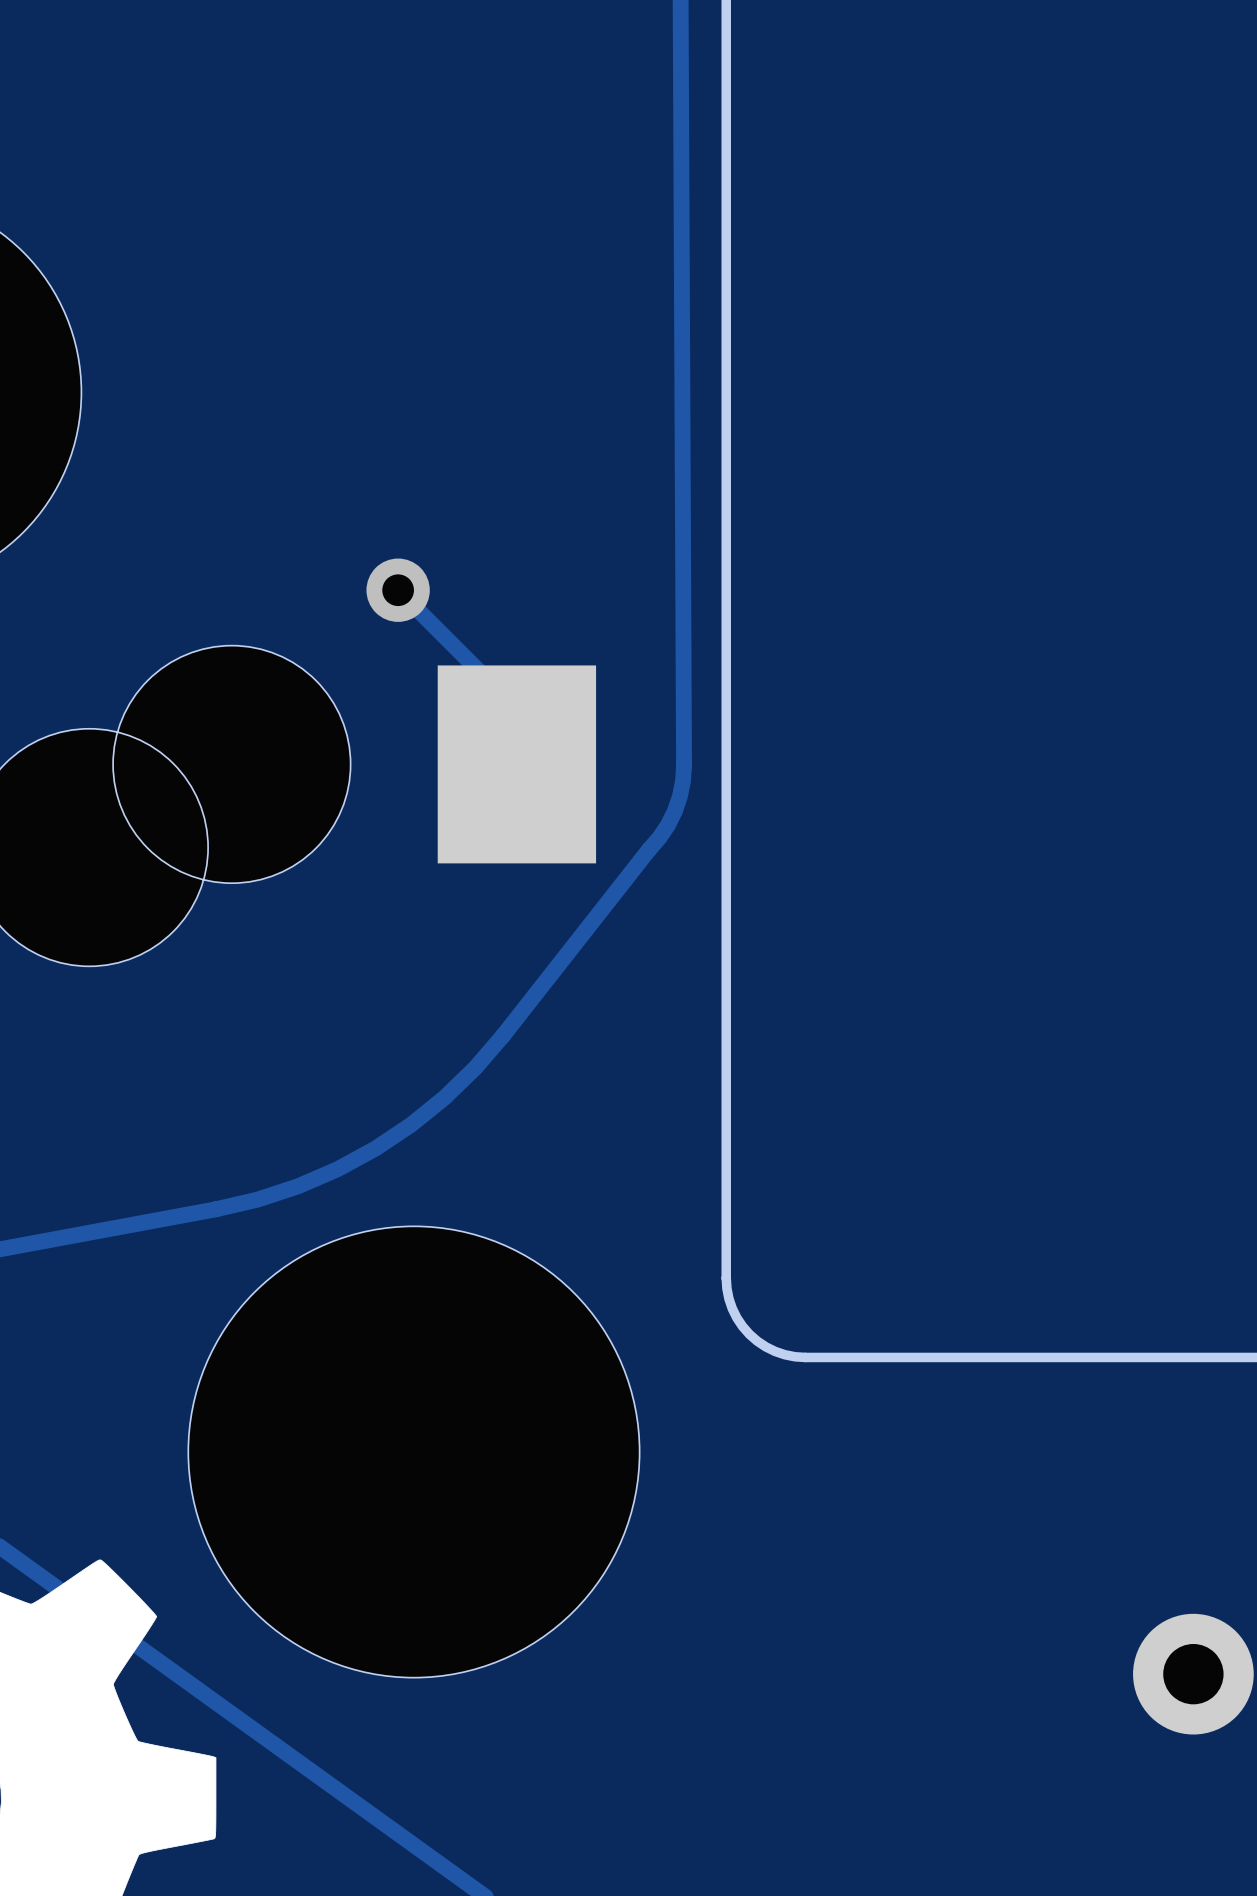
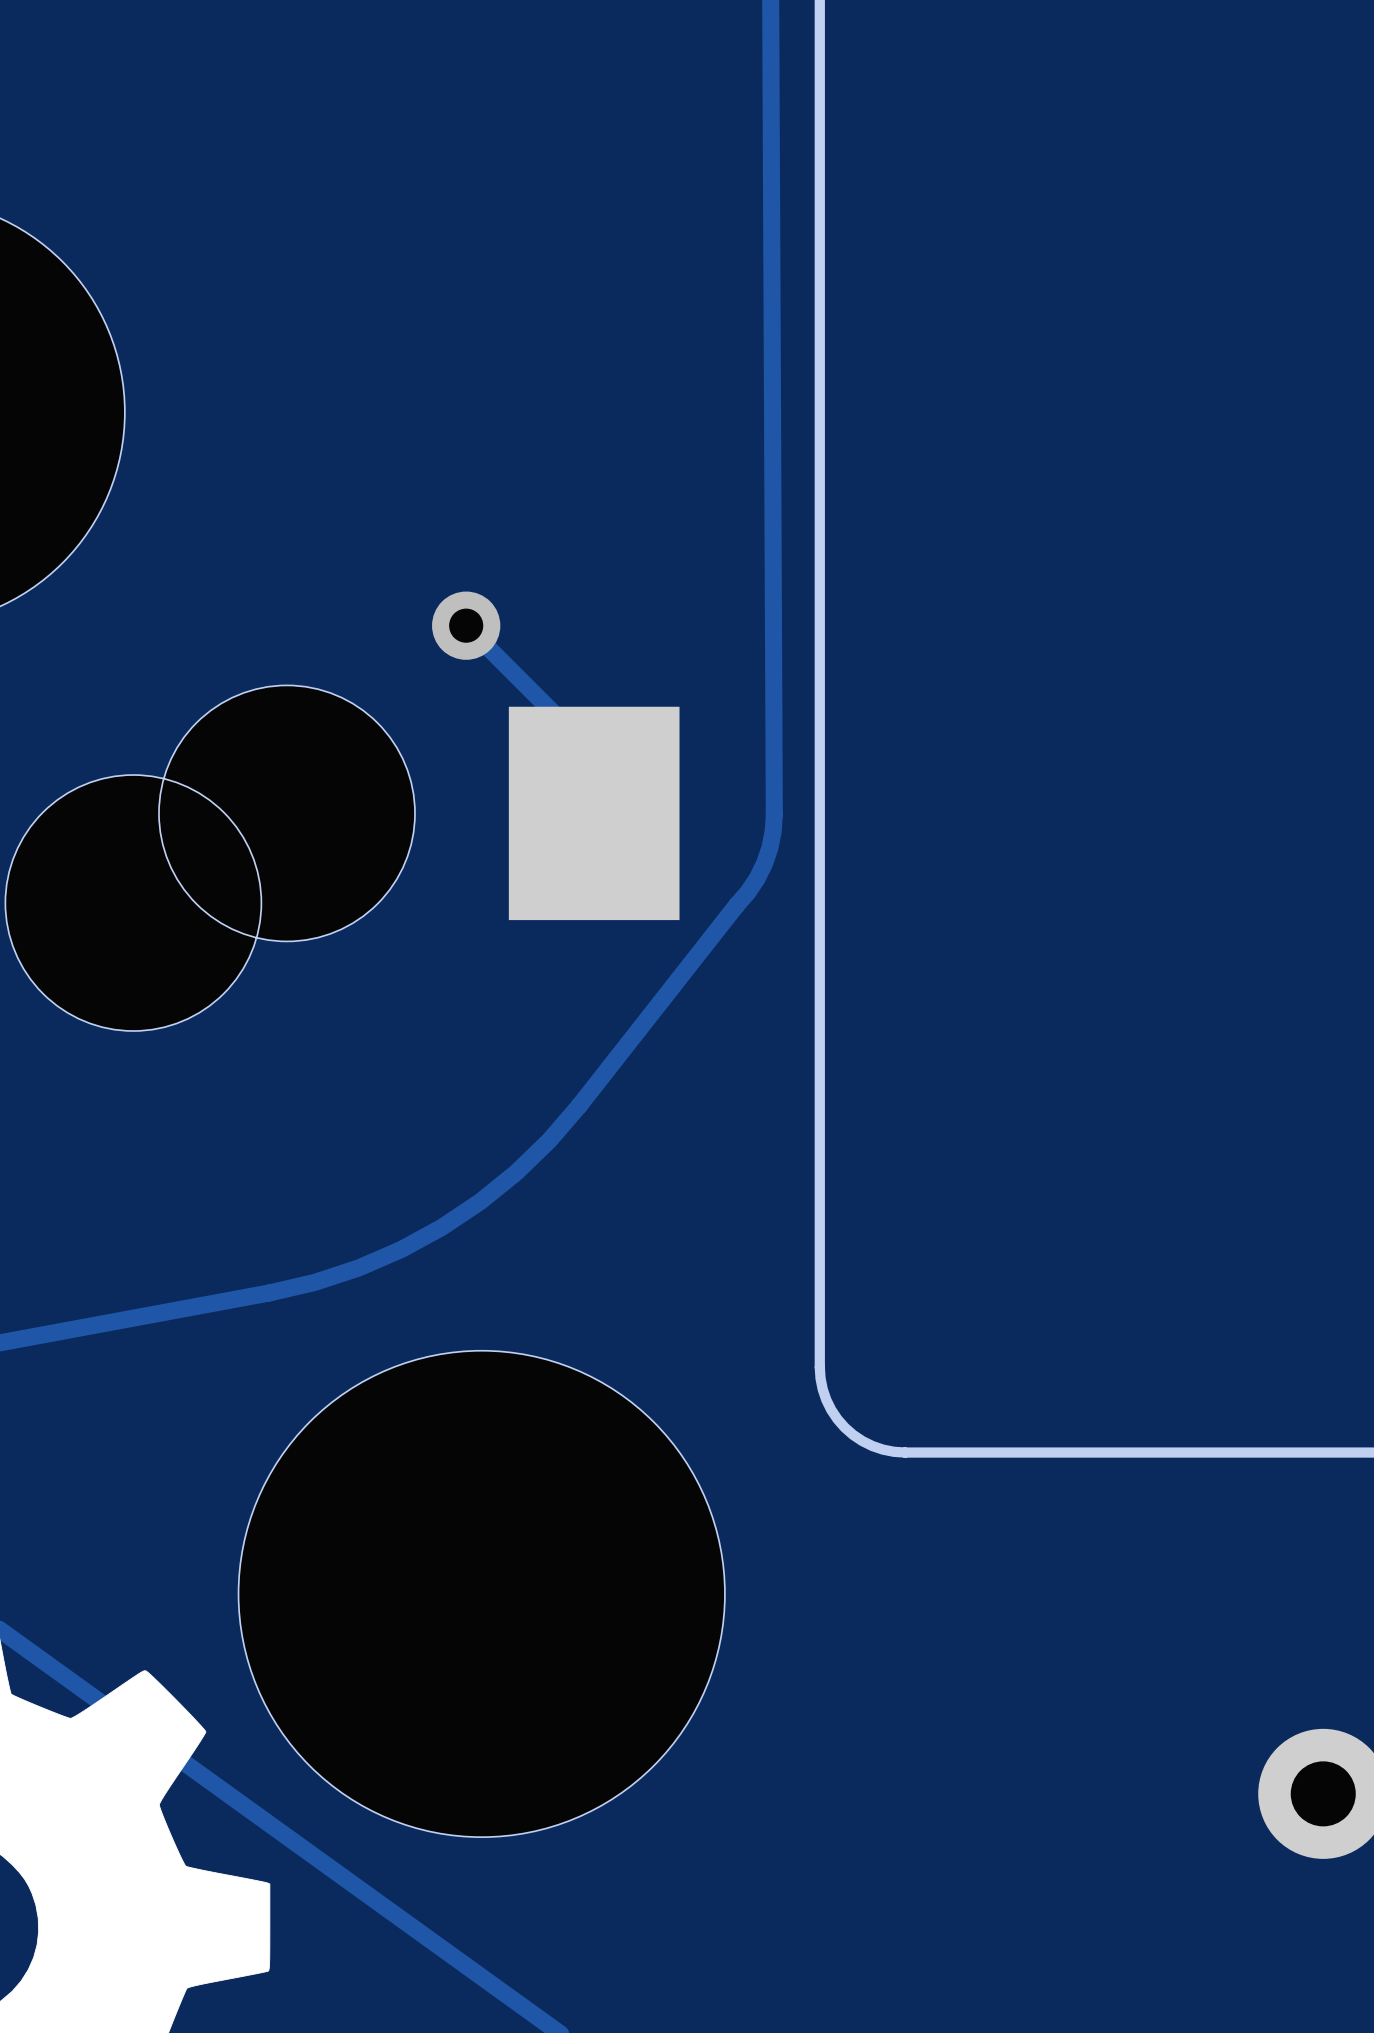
part position: (413, 1452) -> (481, 1593)

